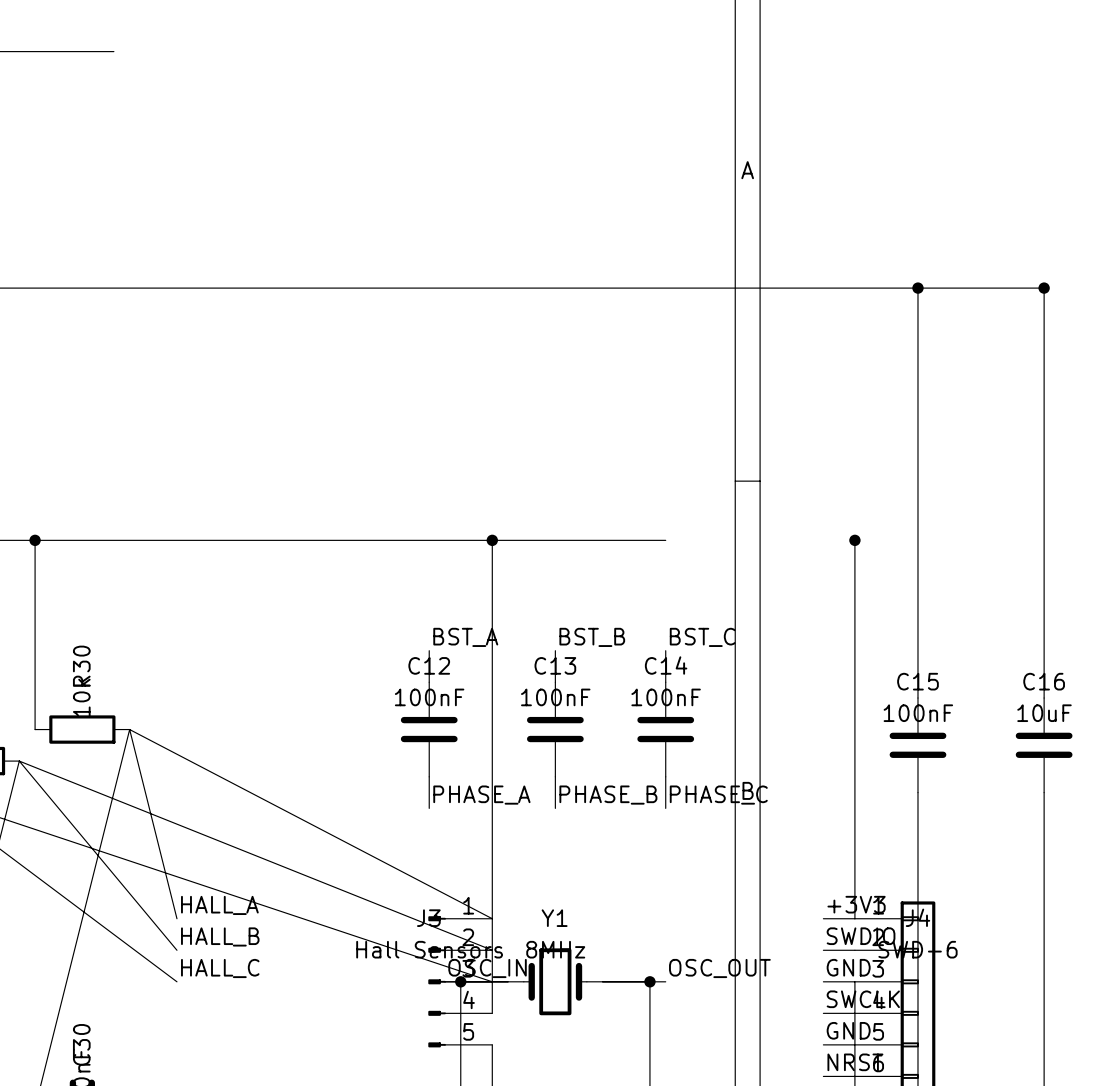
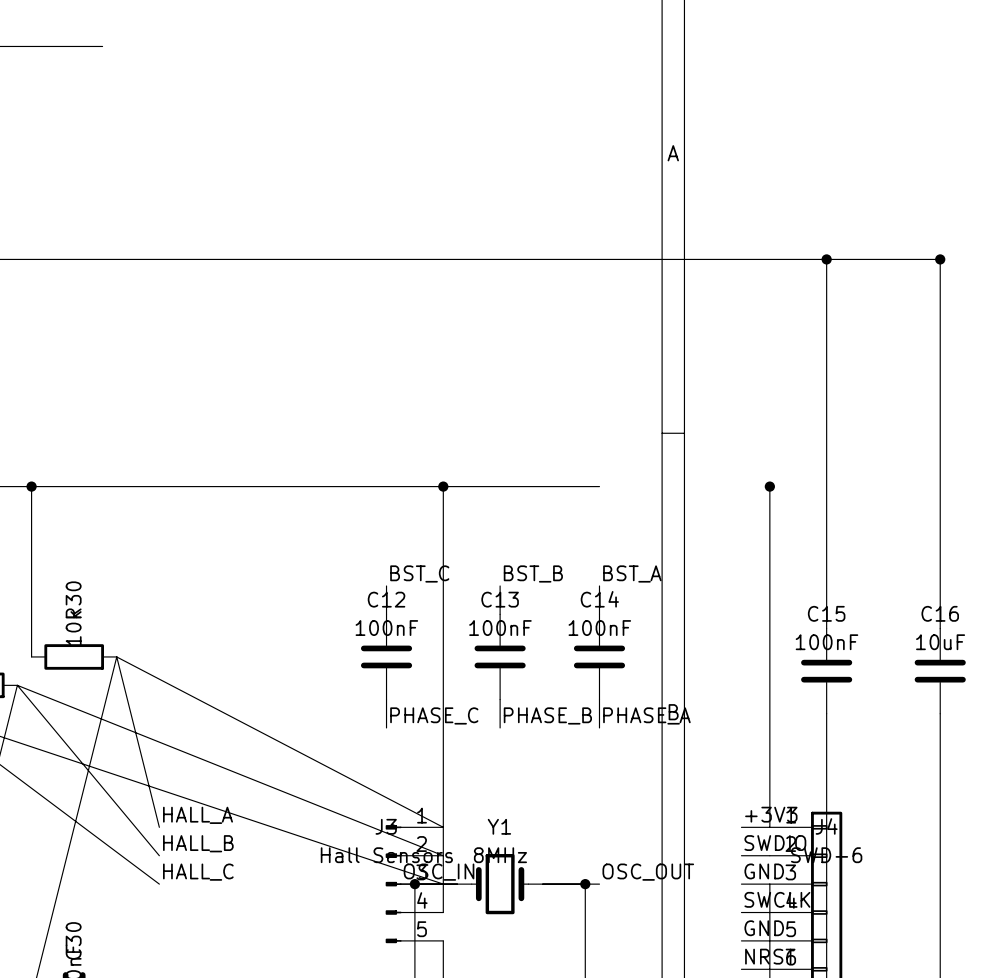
label: BST_A (465, 637) -> BST_C (419, 573)
label: BST_C (702, 637) -> BST_A (632, 573)
label: PHASE_A (481, 795) -> PHASE_C (434, 715)
label: PHASE_C (718, 795) -> PHASE_A (646, 715)

